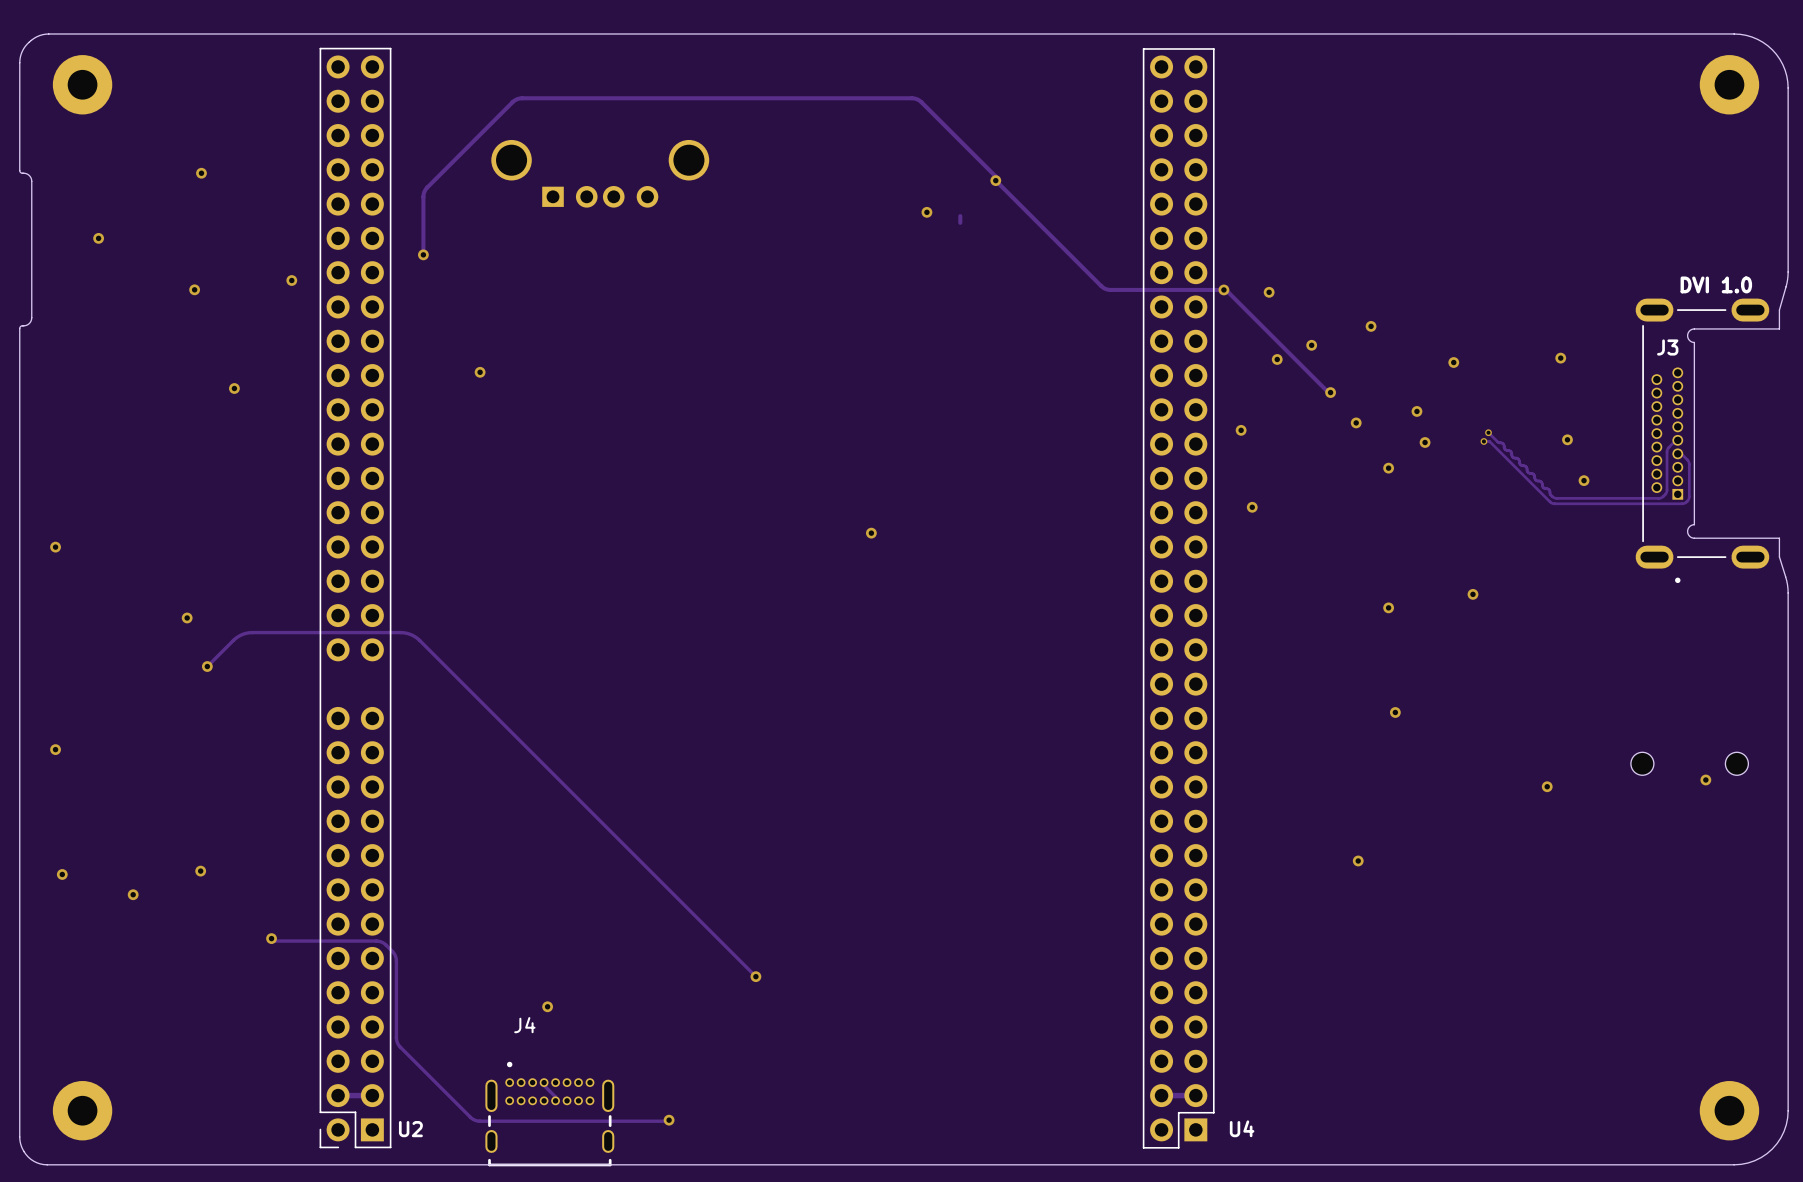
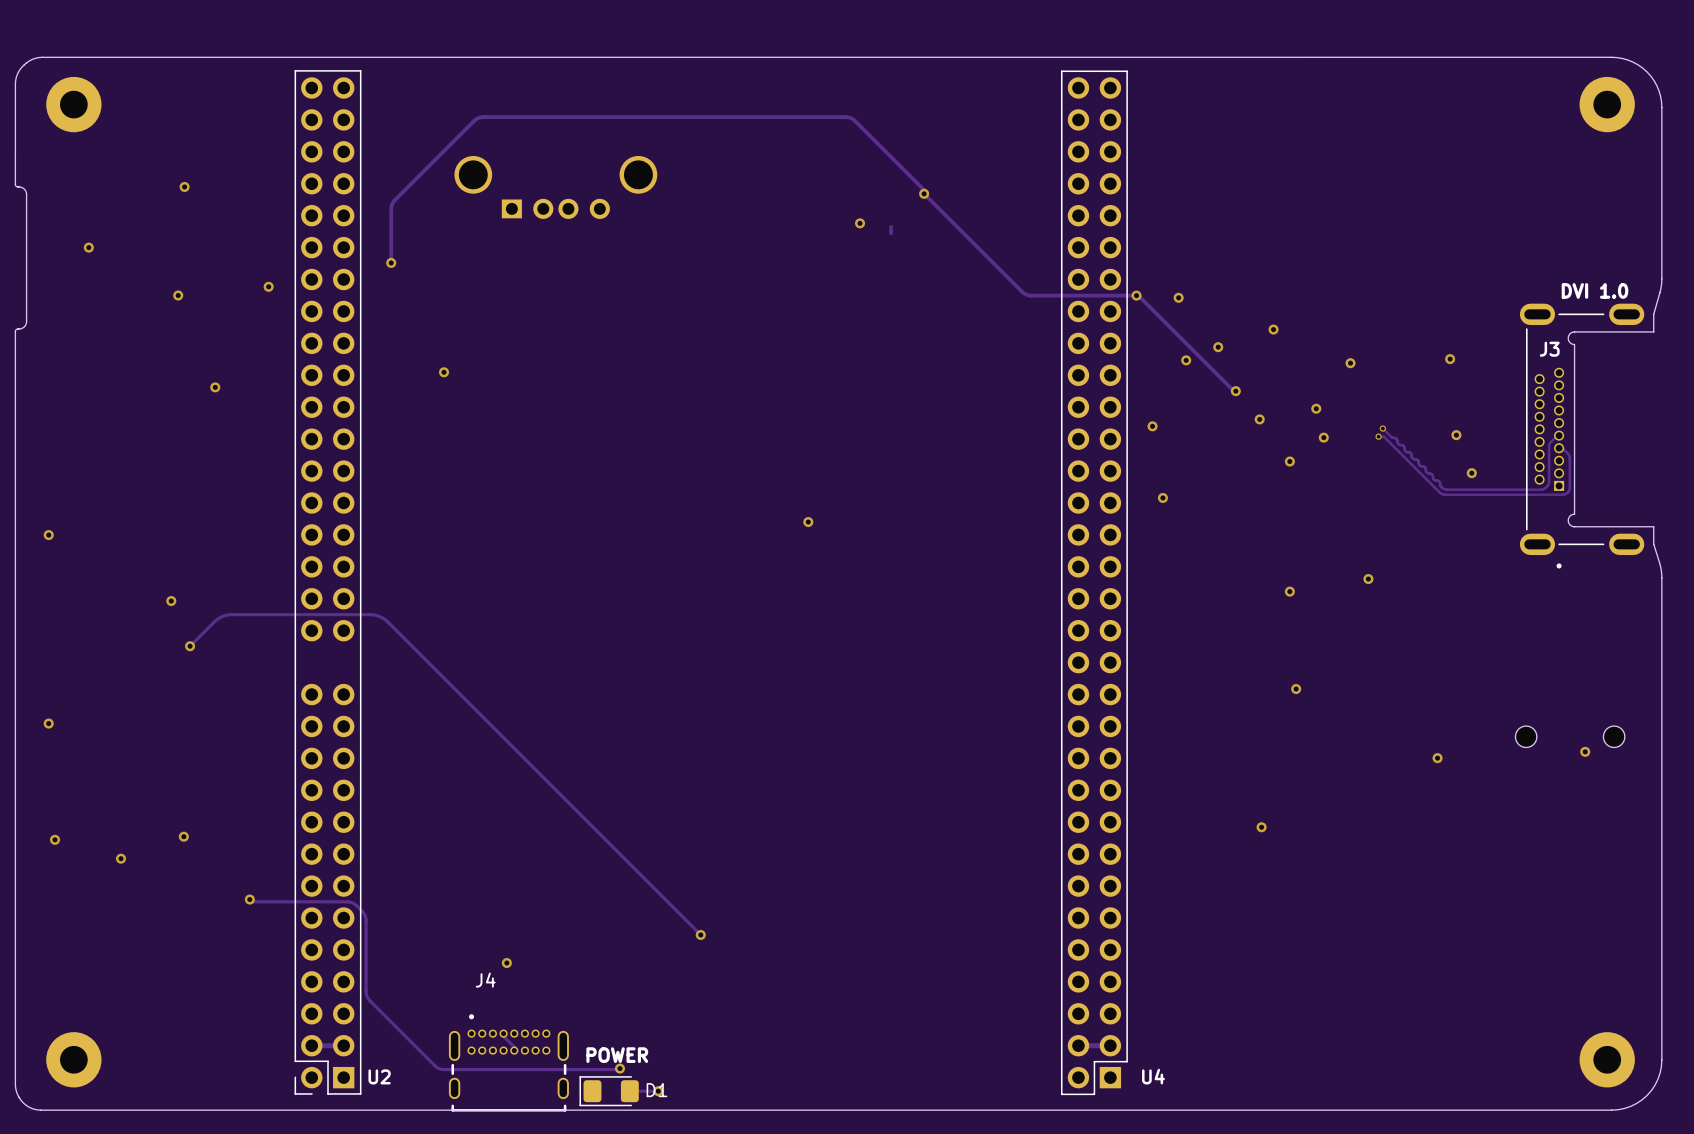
text: none -> POWER (617, 1055)
D1: none -> (609, 1091)
track: none -> (629, 1091) (658, 1091)
via: none -> (658, 1091)

